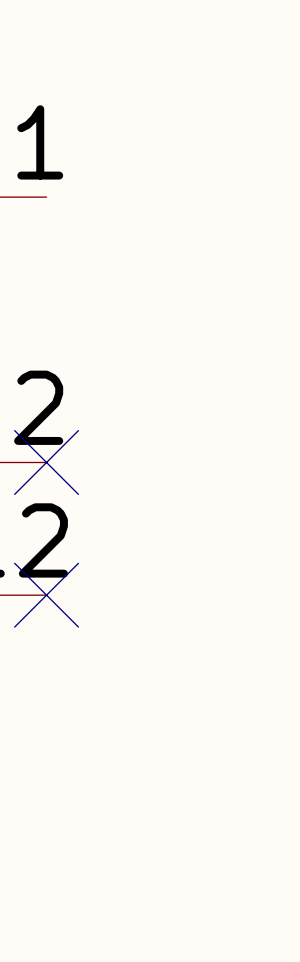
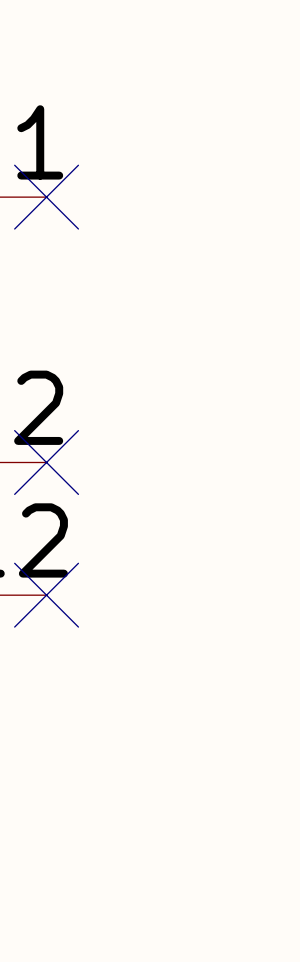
no-connect mark: none -> (46, 197)

